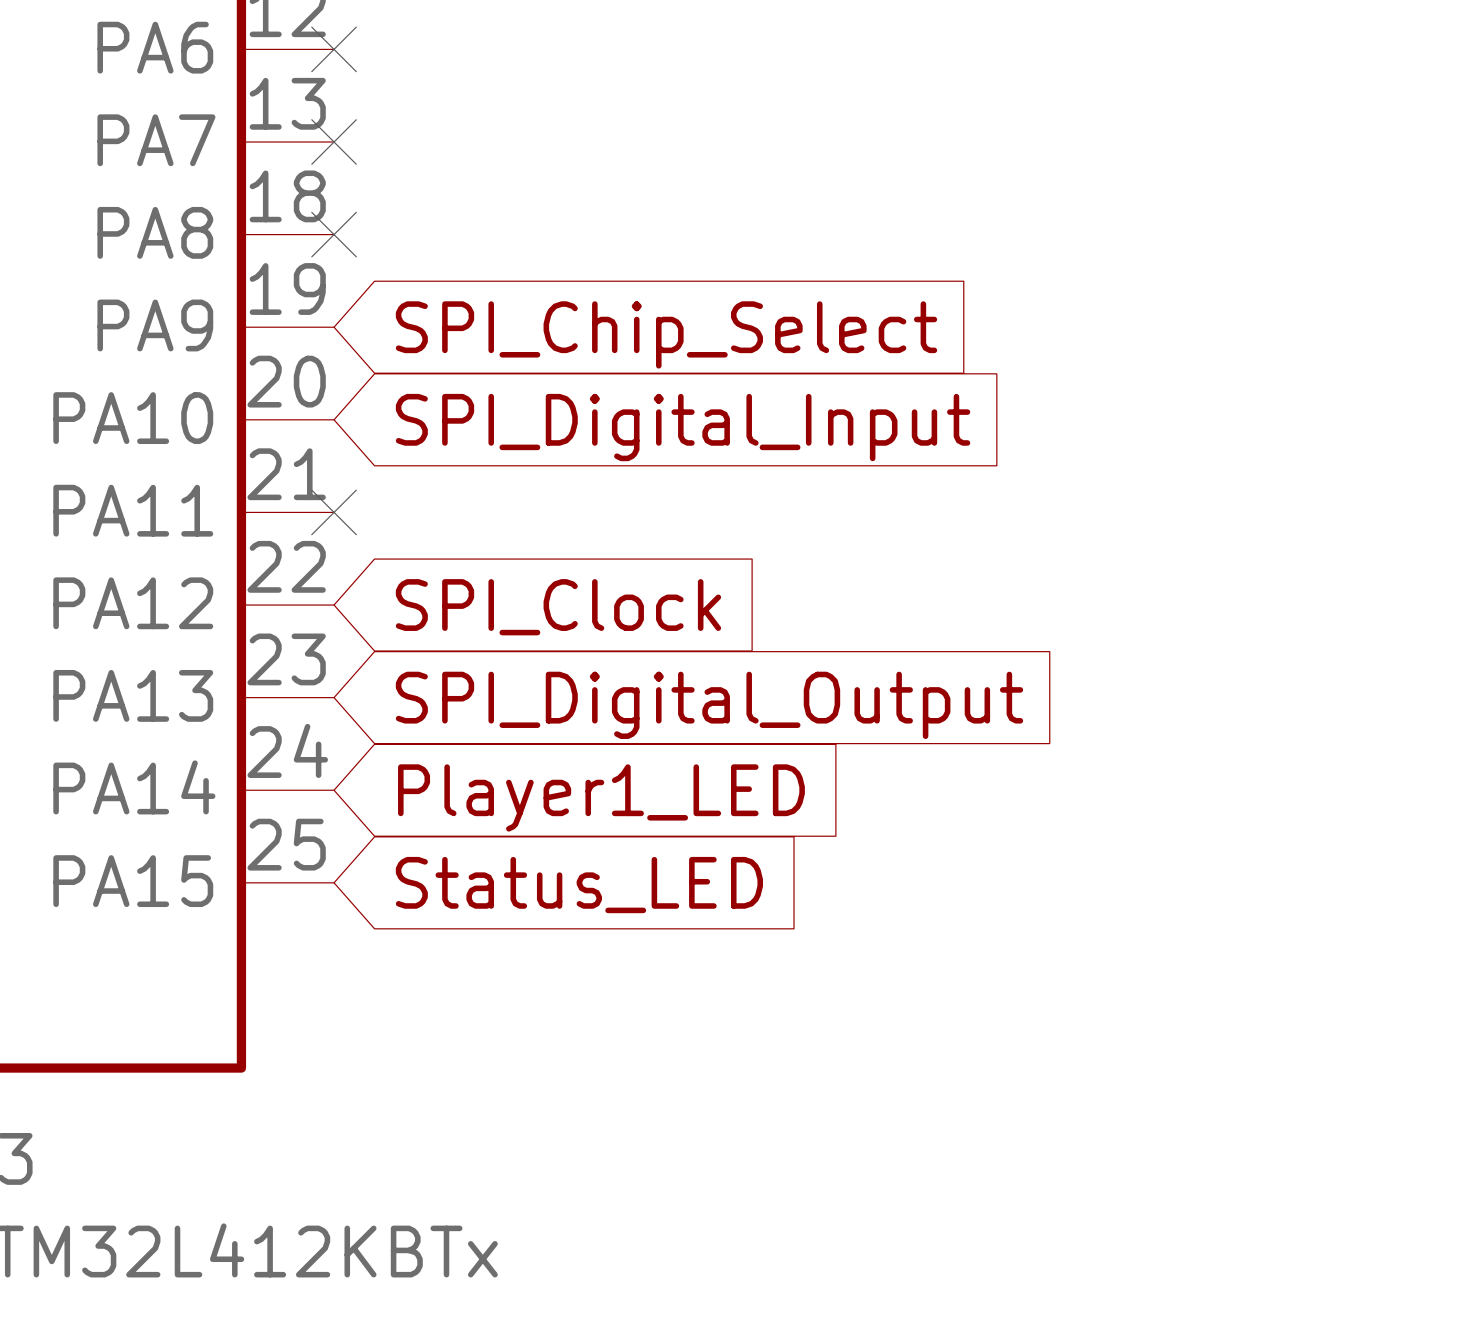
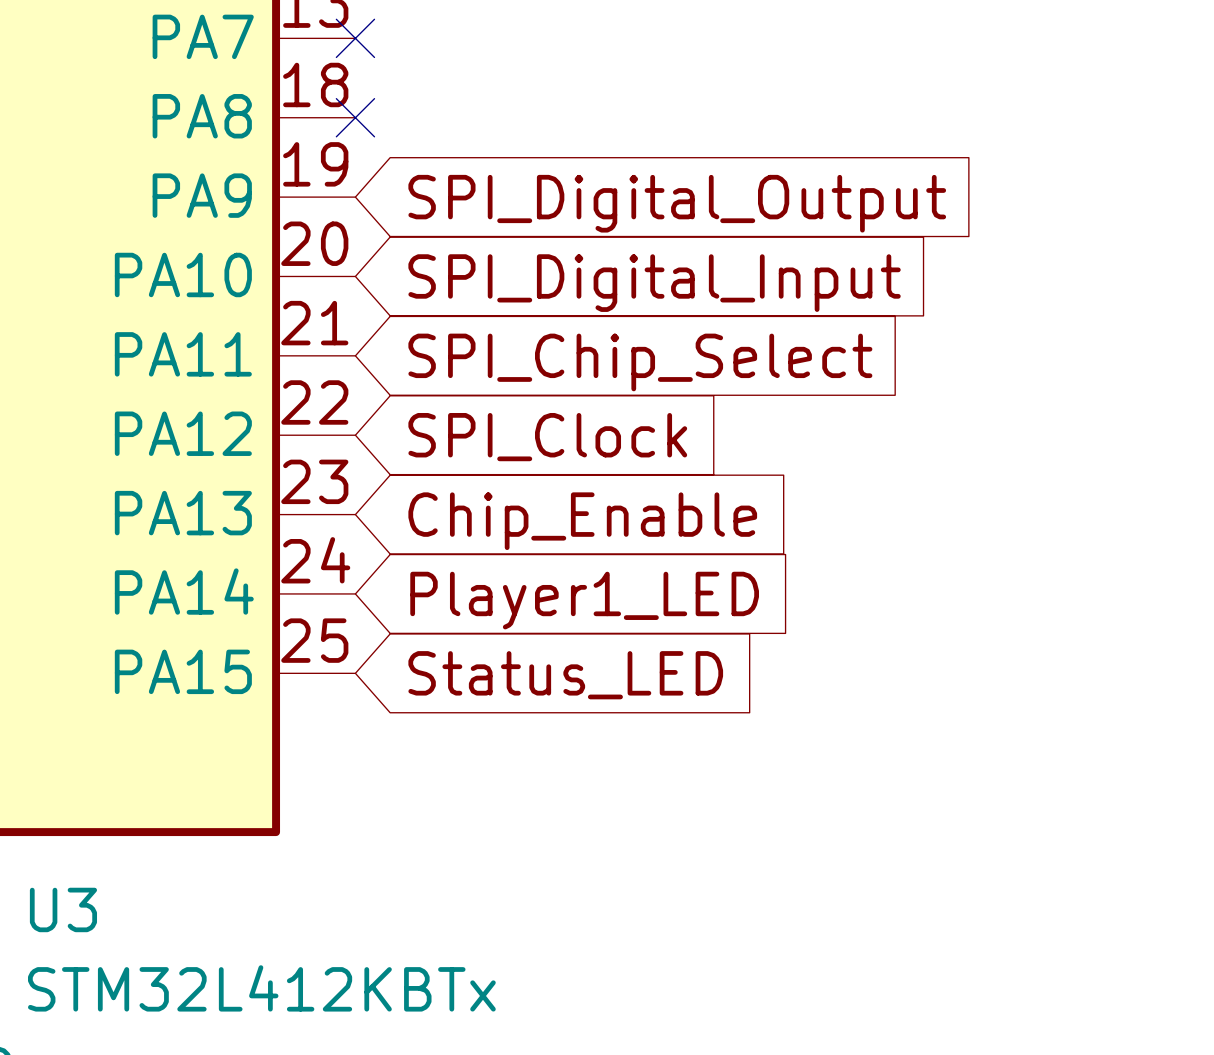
global label: SPI_Chip_Select (666, 334) -> SPI_Digital_Output (677, 203)
no-connect mark: (334, 512) -> none
global label: none -> SPI_Chip_Select (640, 362)
global label: SPI_Digital_Output (709, 705) -> Chip_Enable (582, 521)

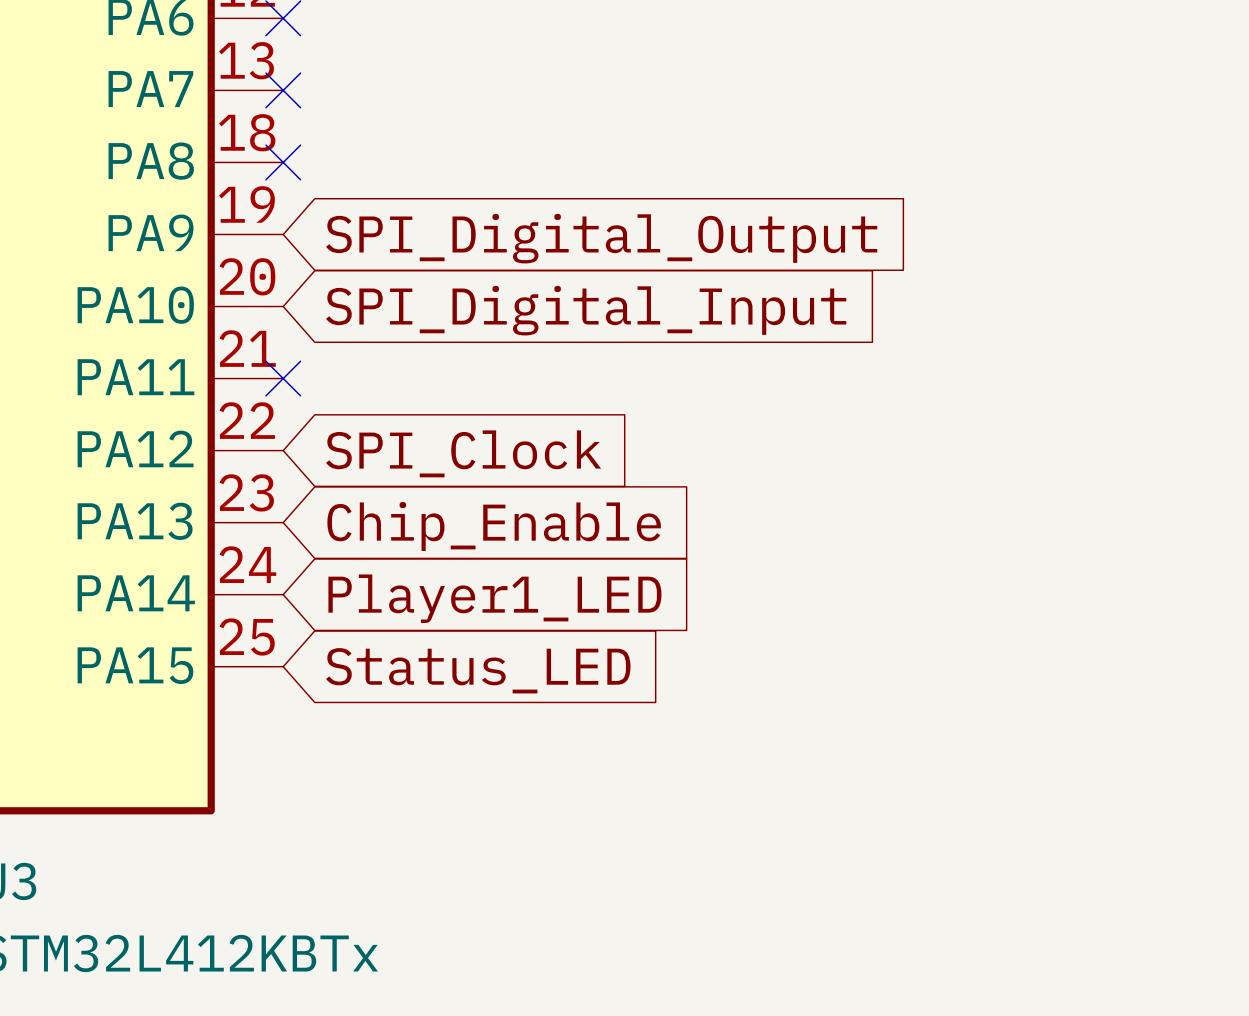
no-connect mark: none -> (283, 378)
global label: SPI_Chip_Select (640, 362) -> none

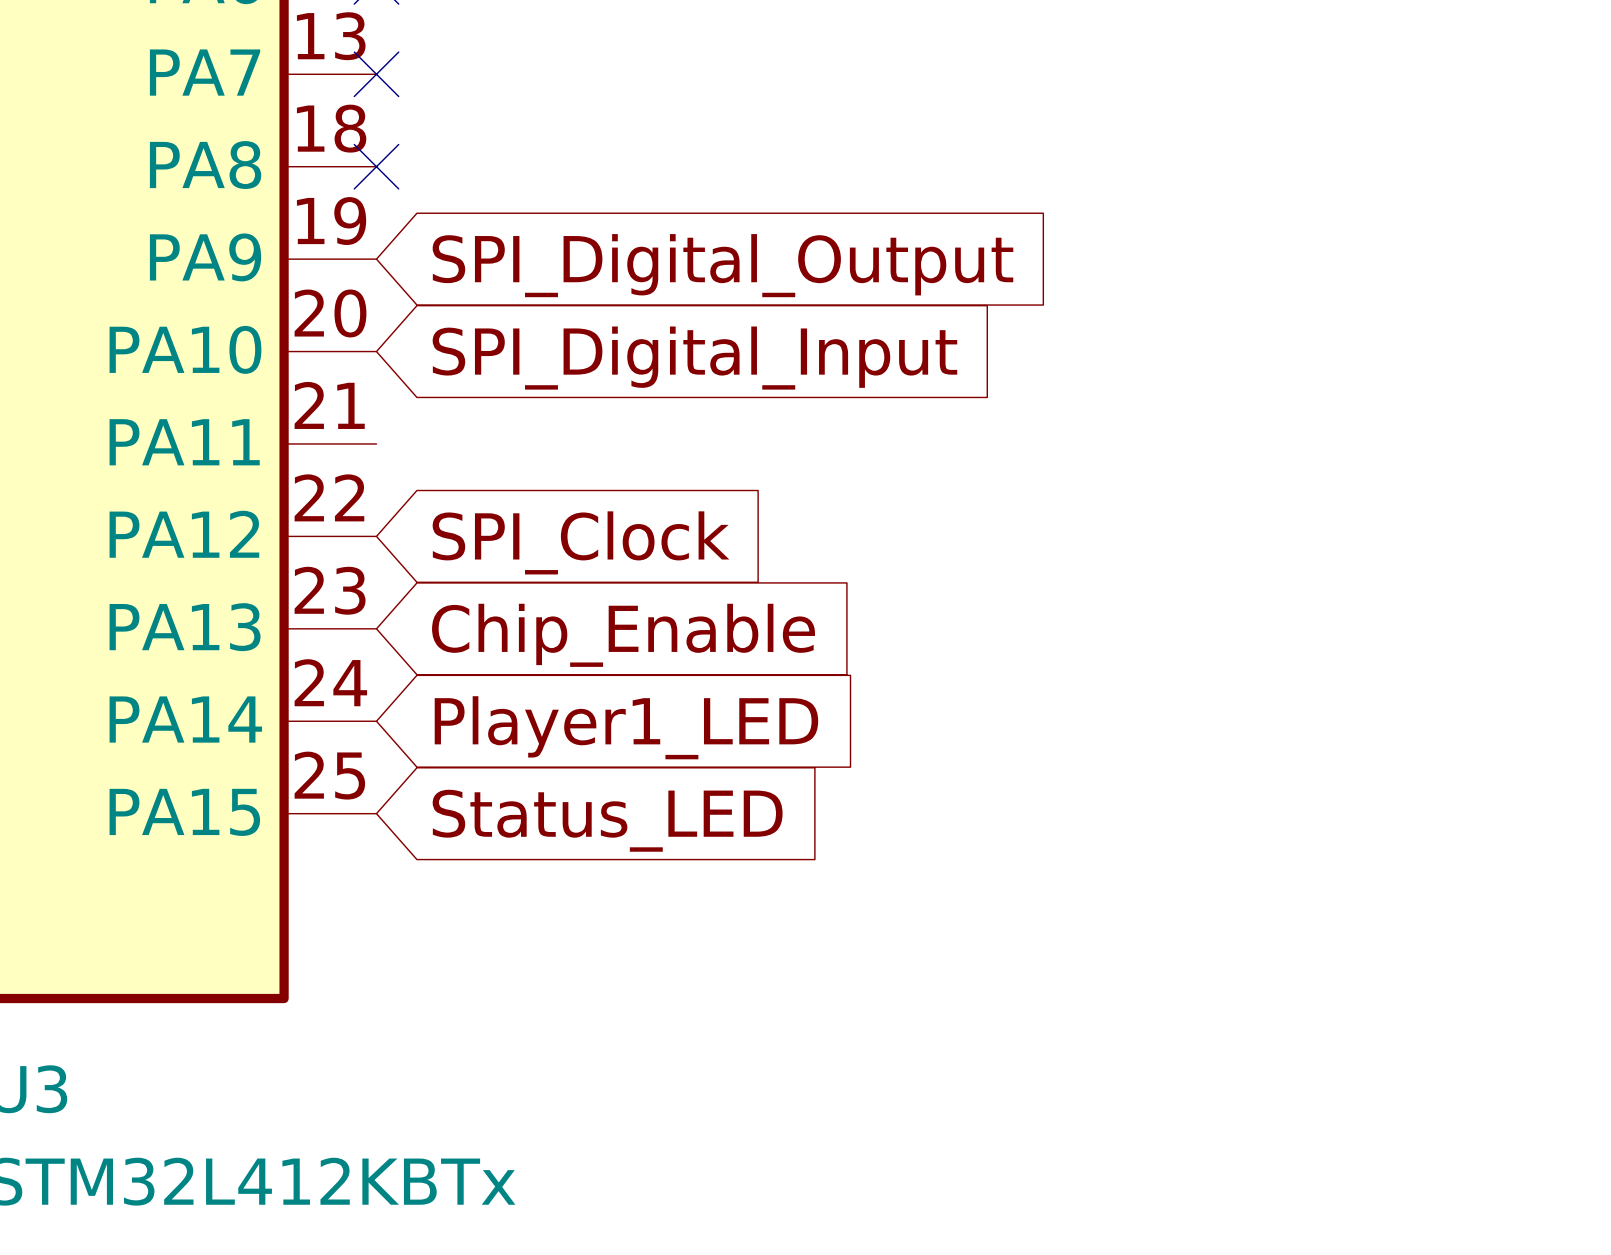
no-connect mark: (283, 378) -> none

